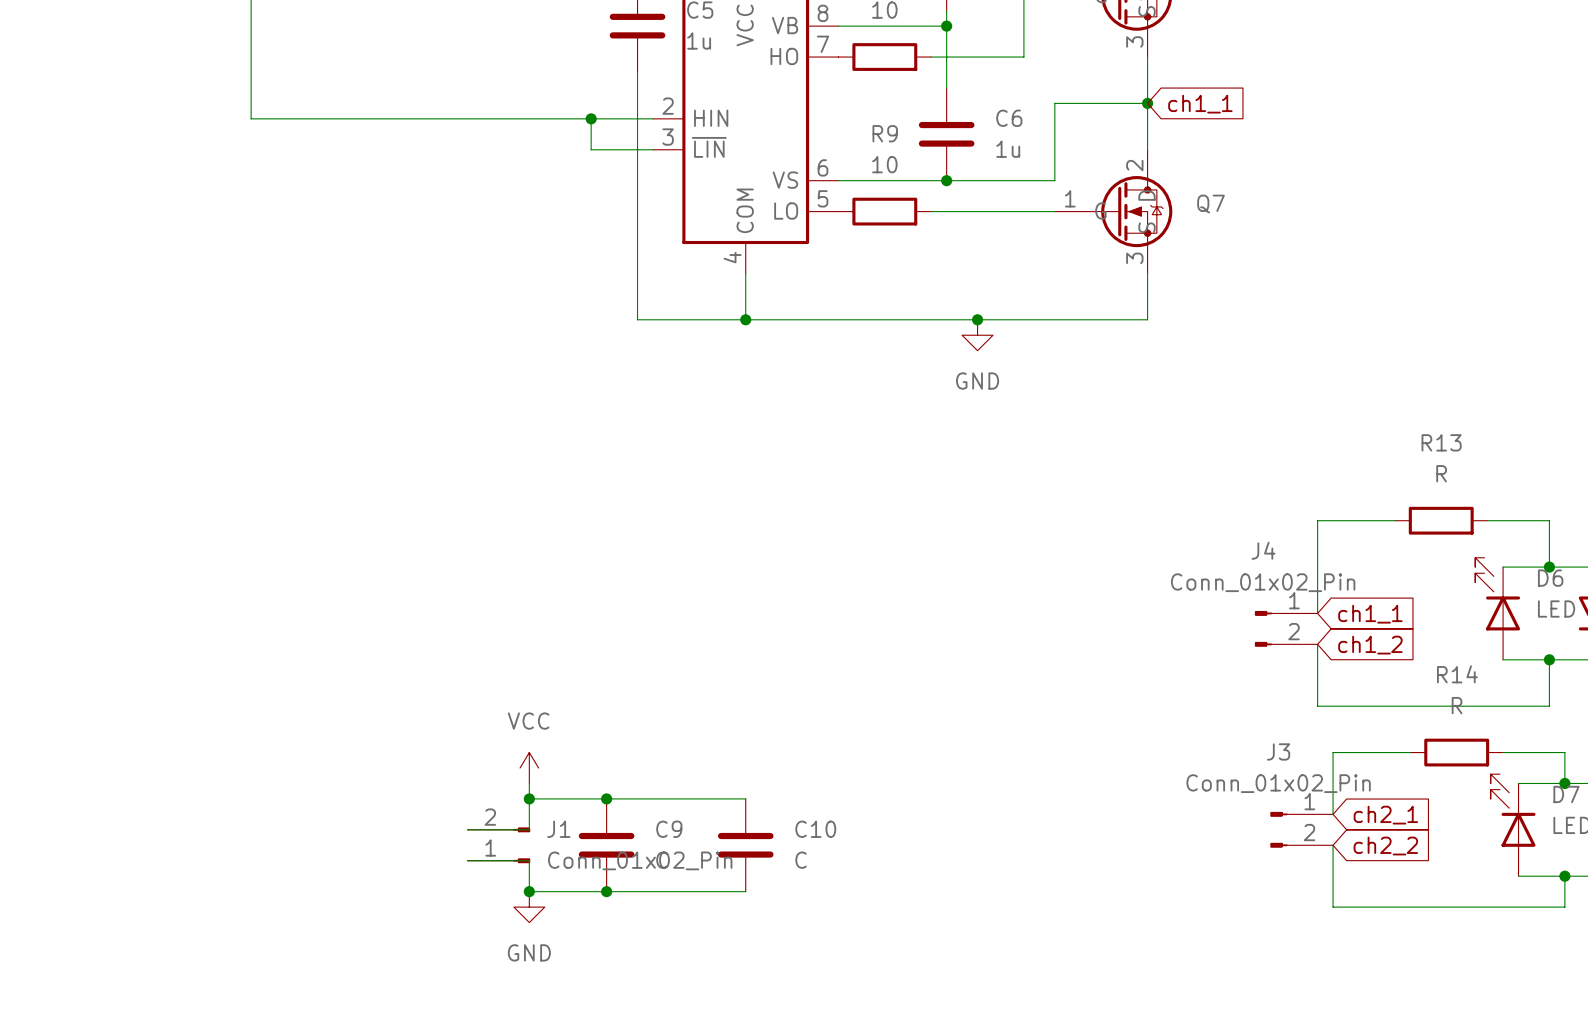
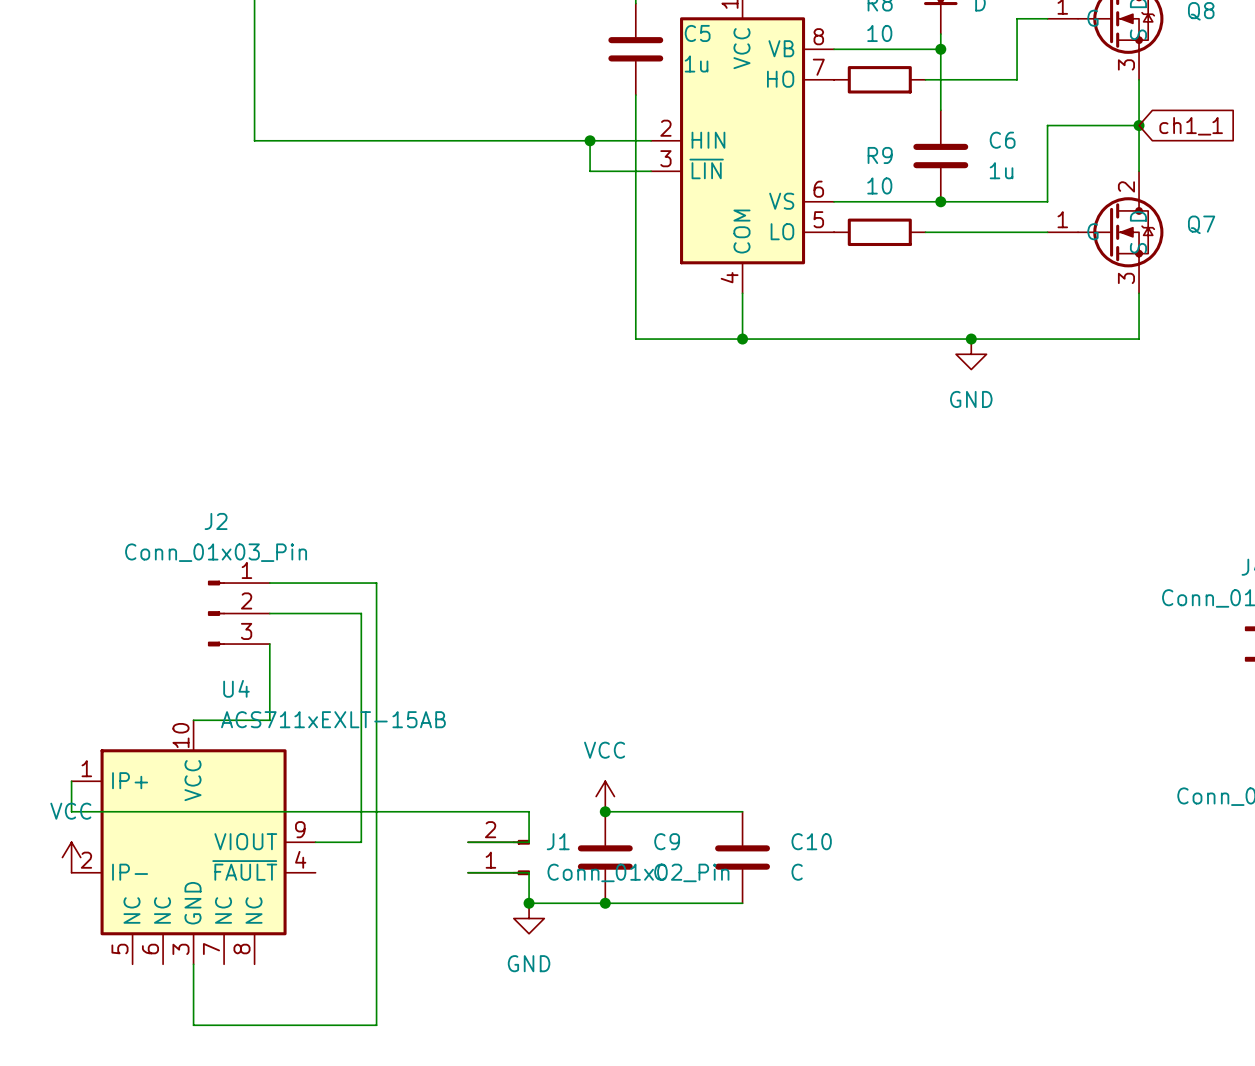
wire: none -> (269, 583) (376, 583) (376, 1025) (193, 1025) (193, 964)
J2: none -> Conn_01x03_Pin (238, 613)
wire: none -> (269, 613) (361, 613) (361, 842) (315, 842)
wire: none -> (269, 644) (269, 720) (193, 720)
wire: none -> (71, 781) (71, 811) (529, 811)
power symbol position: VCC (529, 768) -> VCC (605, 796)
wire: (529, 783) (529, 798) (606, 798) -> none
junction: (529, 798) -> none
U4: none -> ACS711xEXLT-15AB (193, 842)
power symbol: none -> VCC (71, 857)

